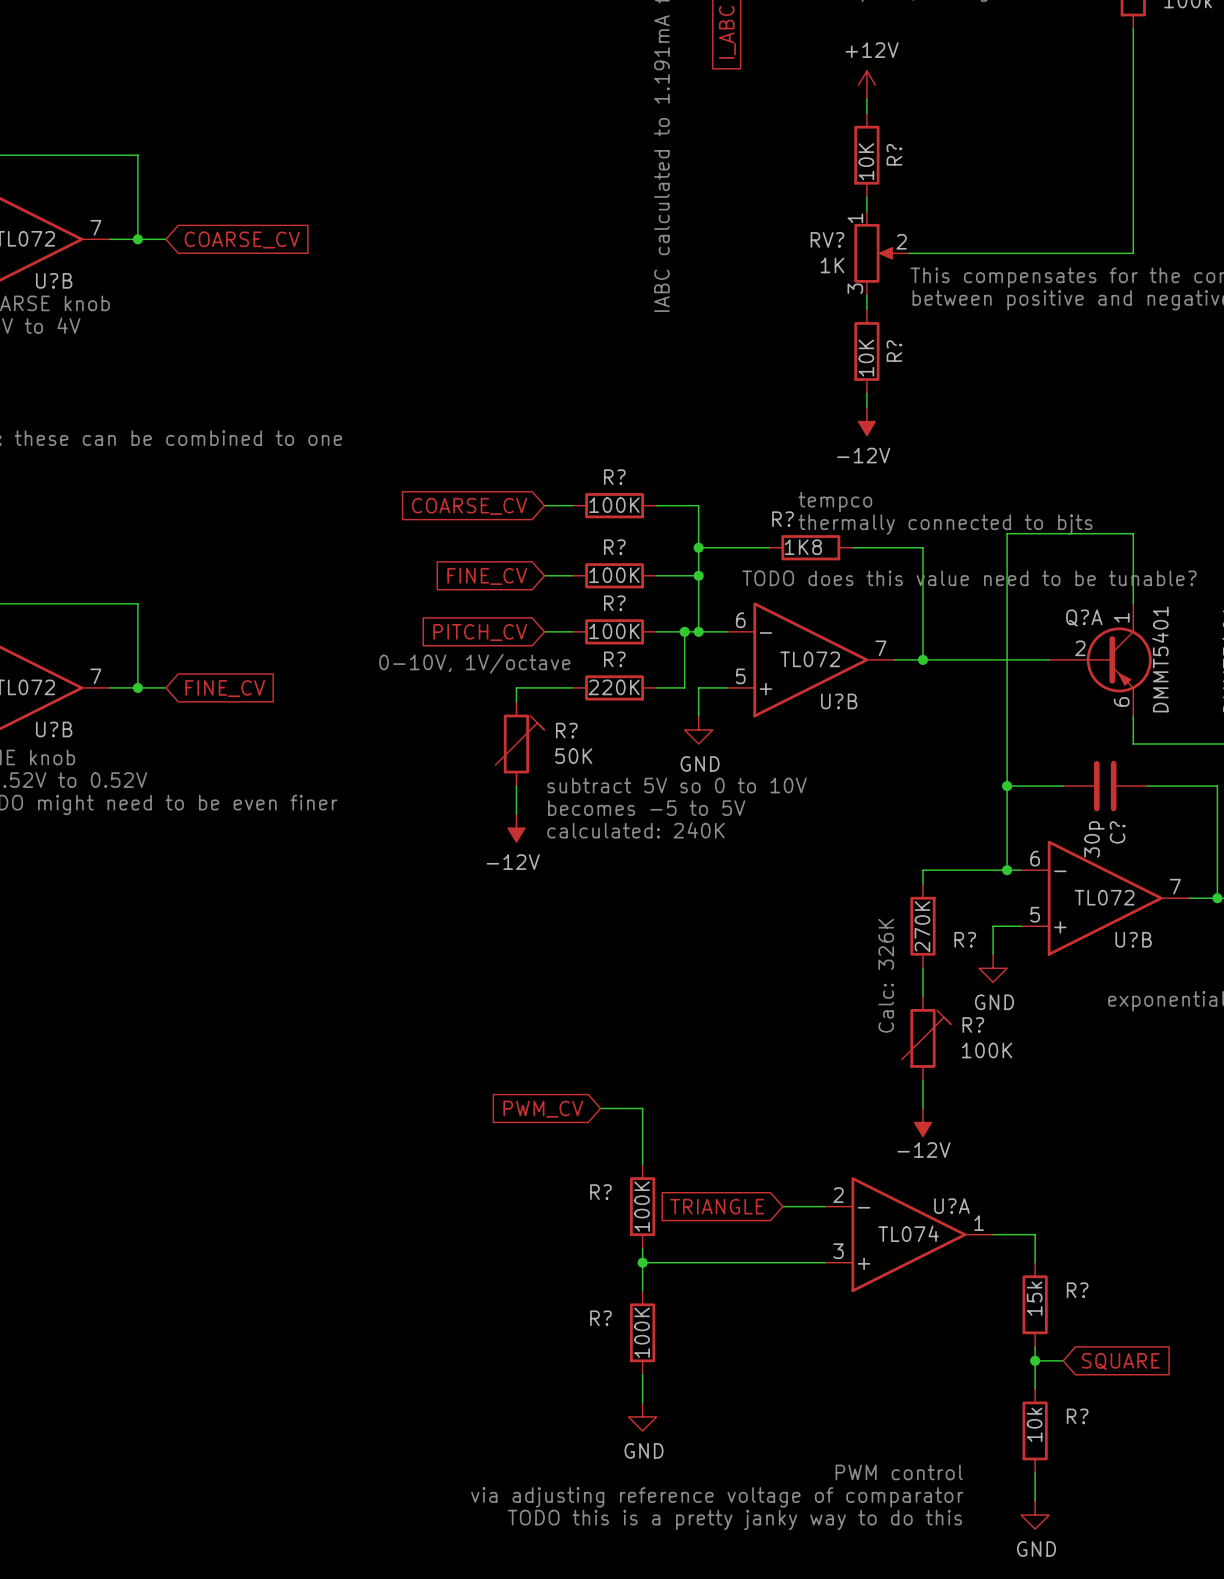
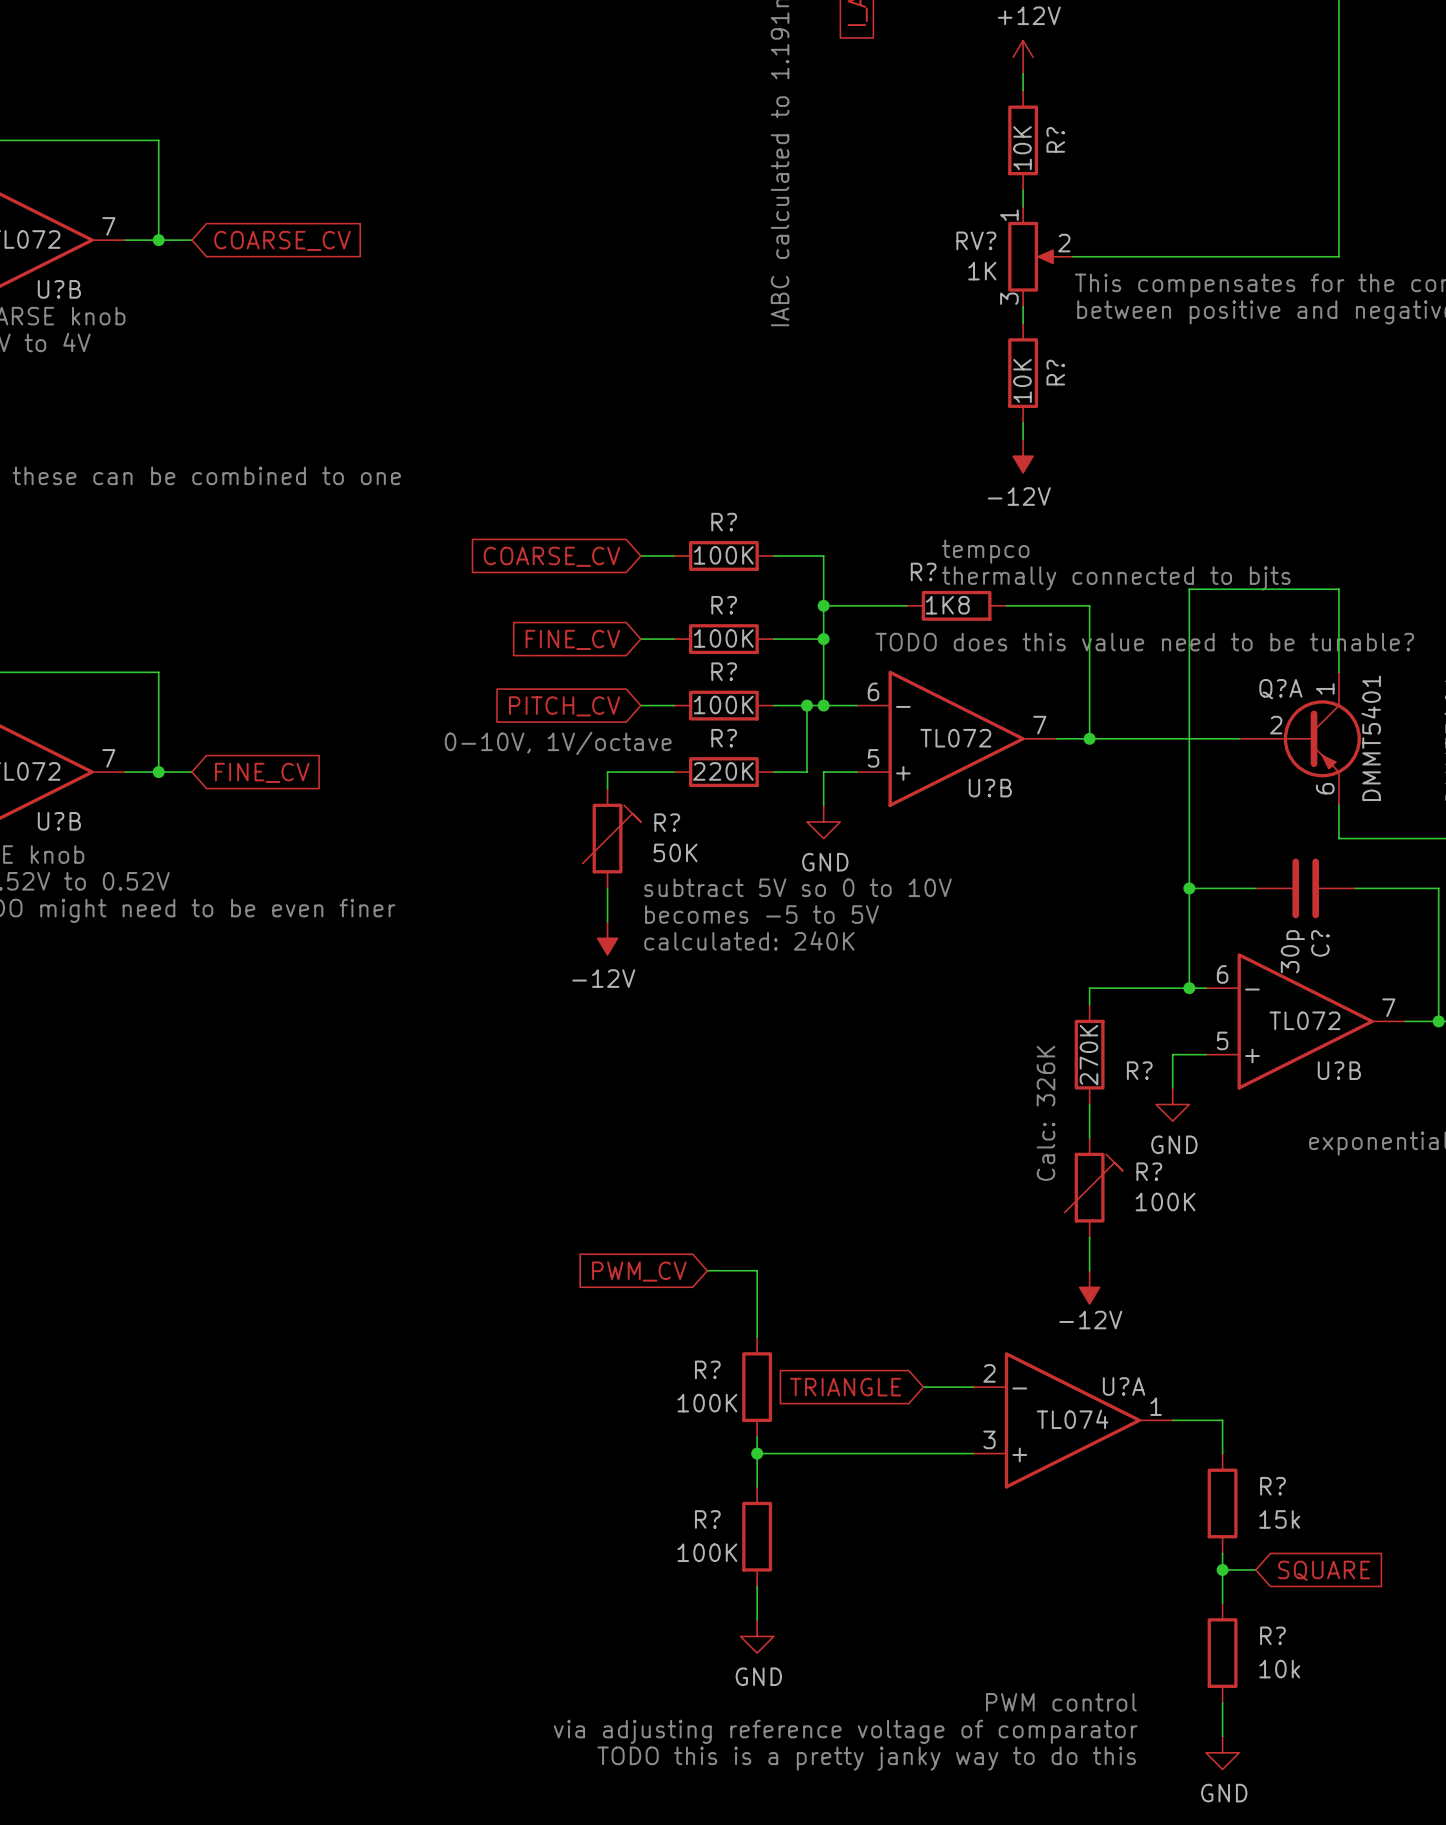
R? value rotation: 0° (642, 1206) -> 90° clockwise (707, 1403)
R? value rotation: 0° (1034, 1298) -> 90° clockwise (1279, 1519)
R? value position: 15k (1034, 1298) -> 15k (1279, 1519)
R? value rotation: 0° (642, 1332) -> 90° clockwise (707, 1552)
R? value rotation: 0° (1034, 1424) -> 90° clockwise (1279, 1669)
R? value position: 10k (1034, 1424) -> 10k (1279, 1669)

